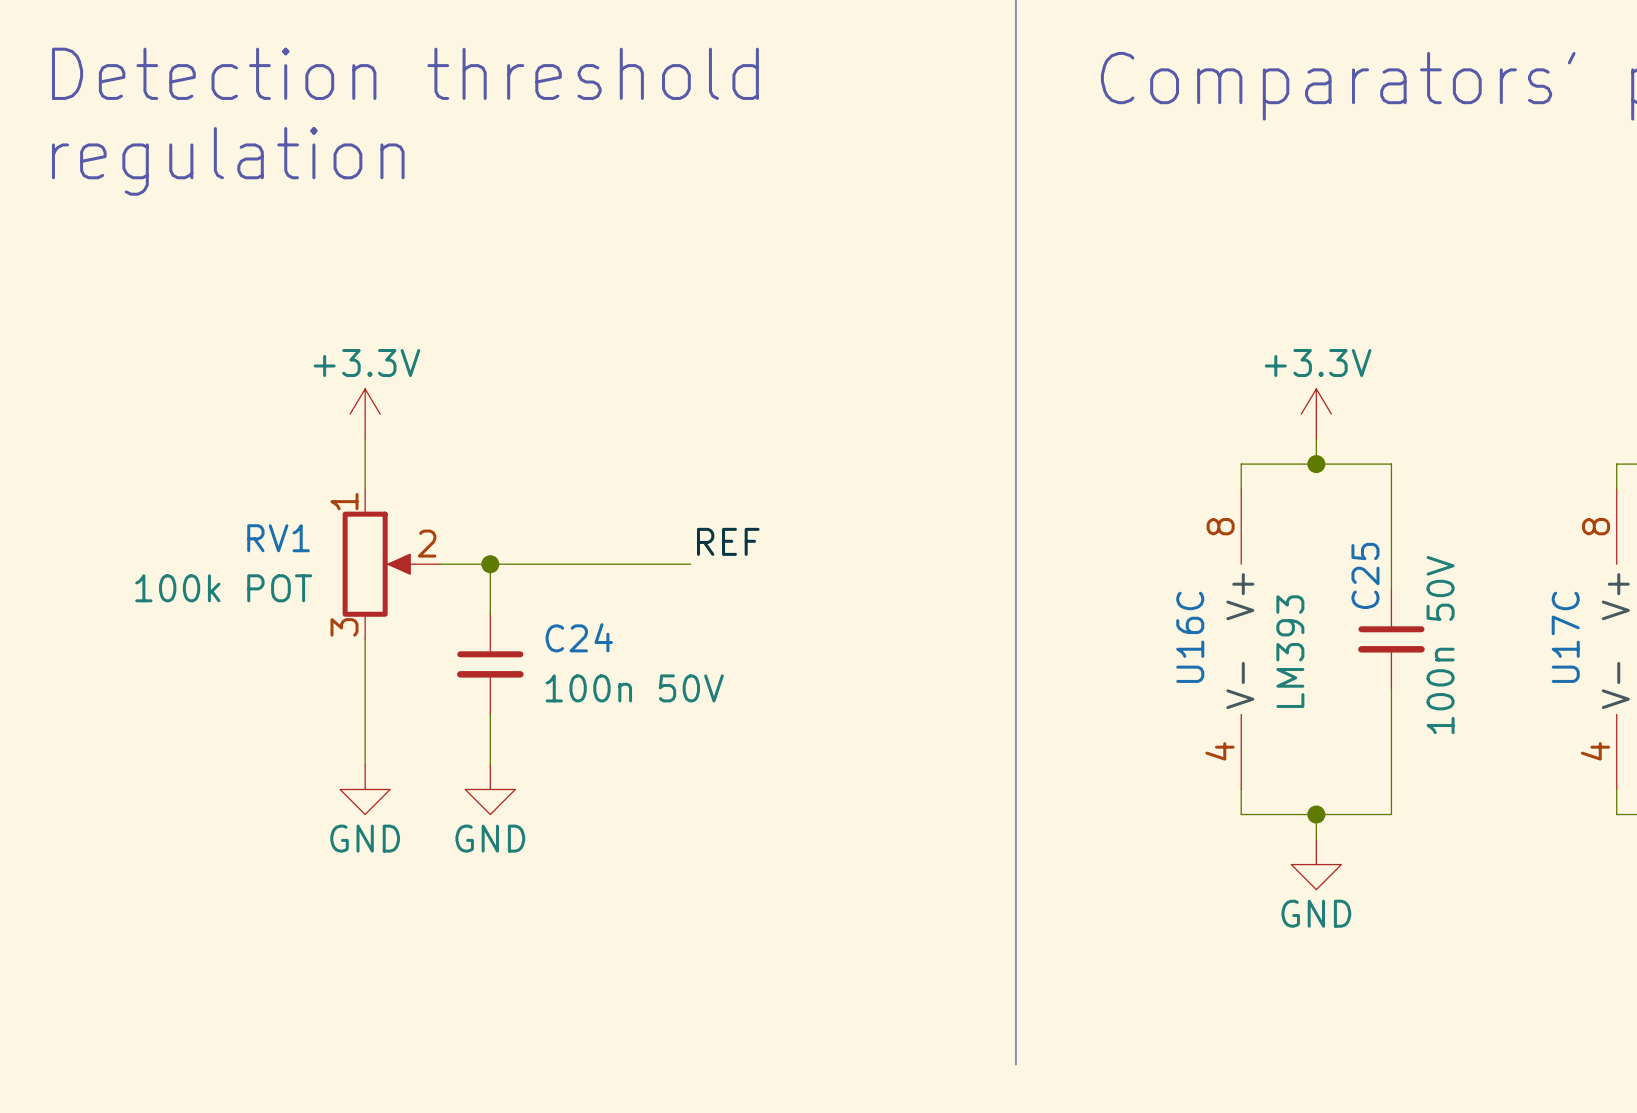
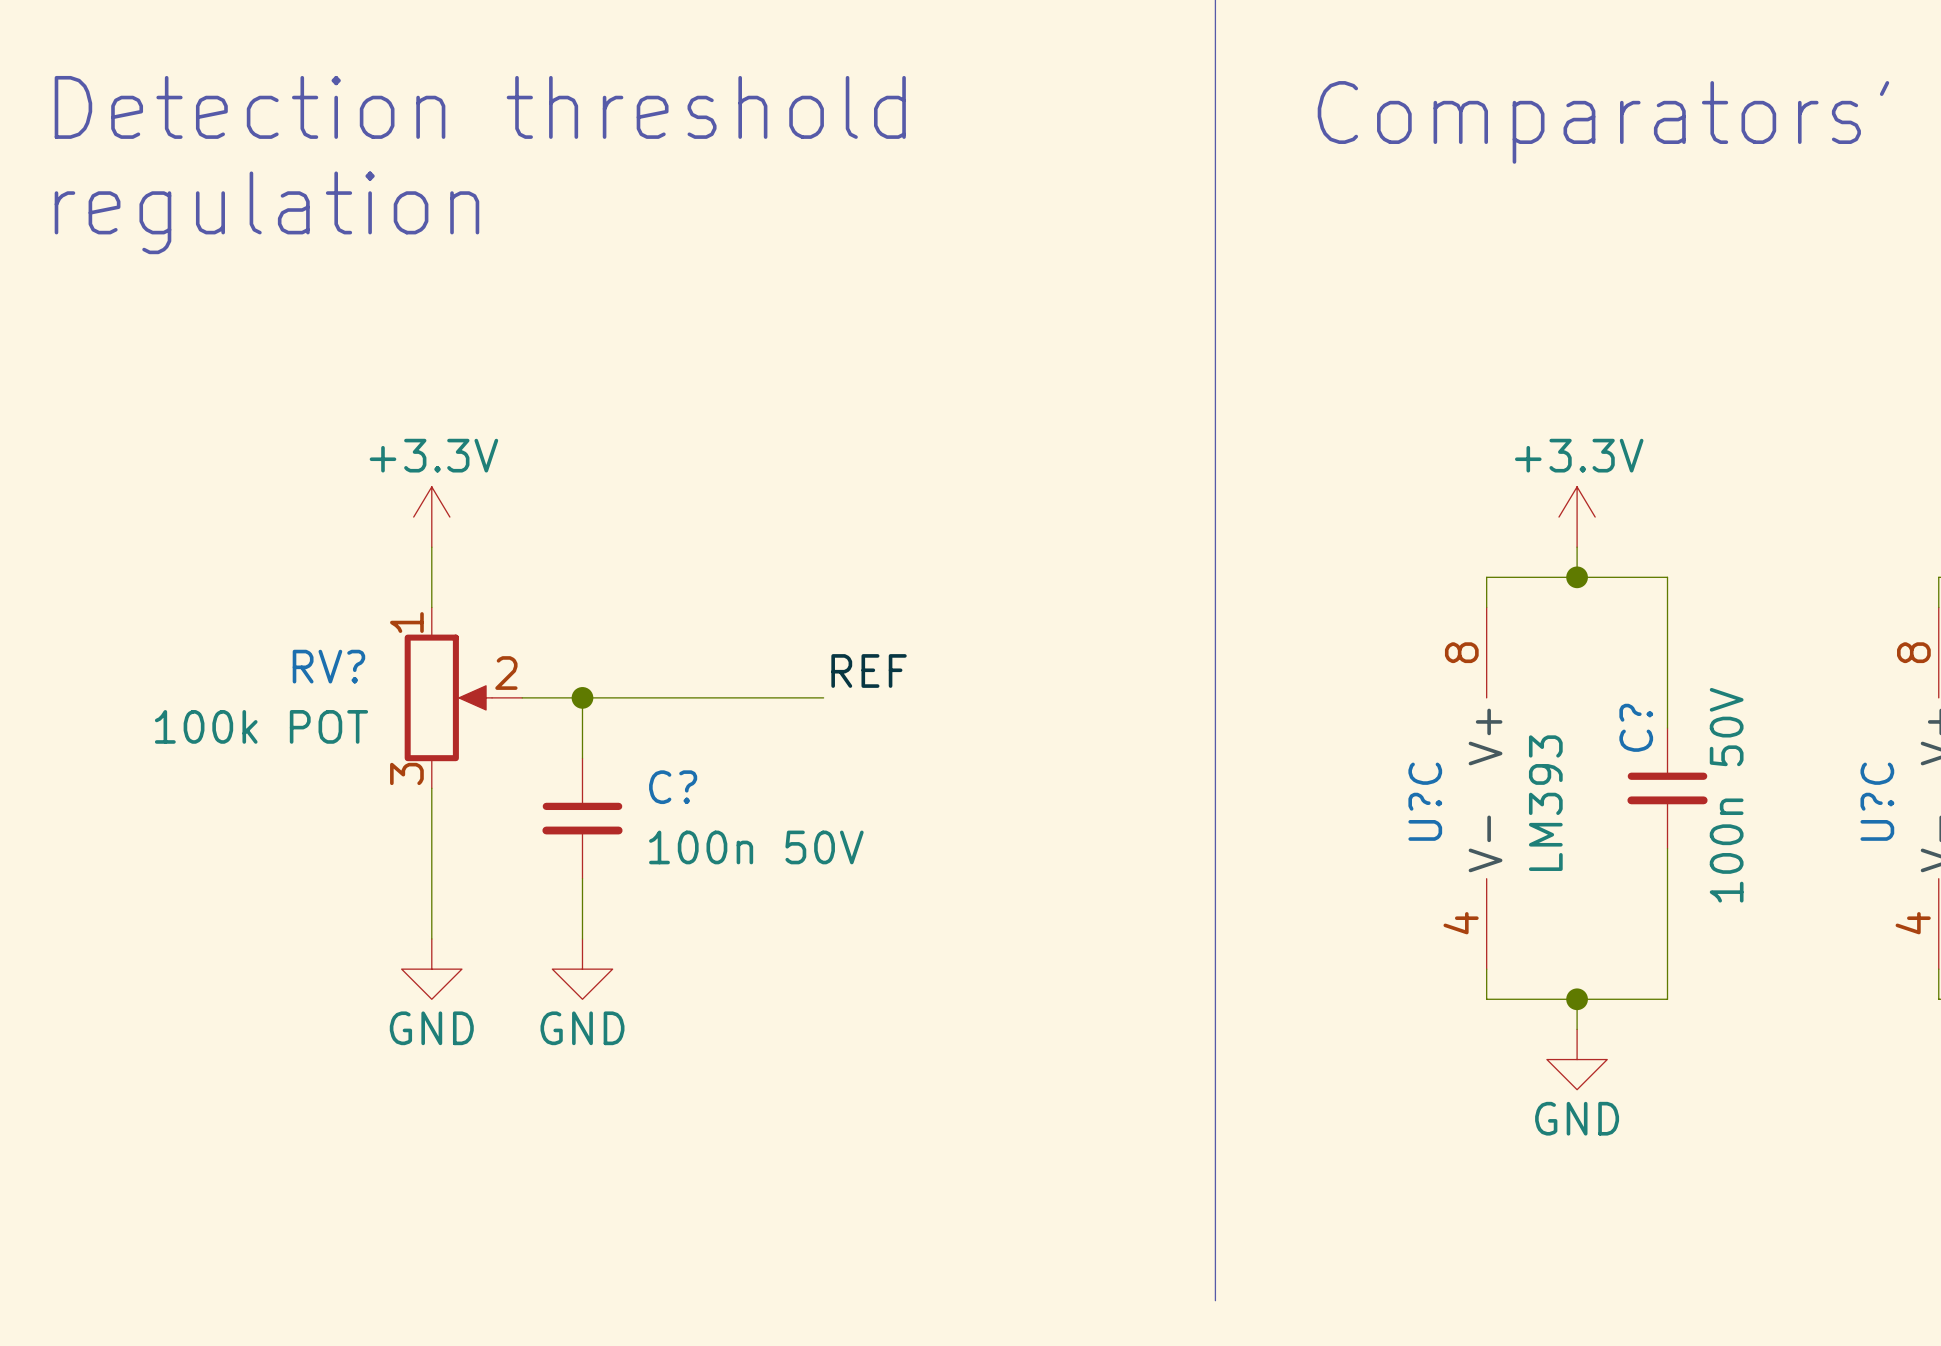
RV1 name: RV1 (278, 538) -> RV? (328, 666)
C25 name: C25 (1365, 575) -> C? (1636, 727)
C24 name: C24 (579, 637) -> C? (673, 787)
U16C name: U16C (1190, 637) -> U?C (1425, 801)
U17C name: U17C (1565, 637) -> U?C (1877, 801)

